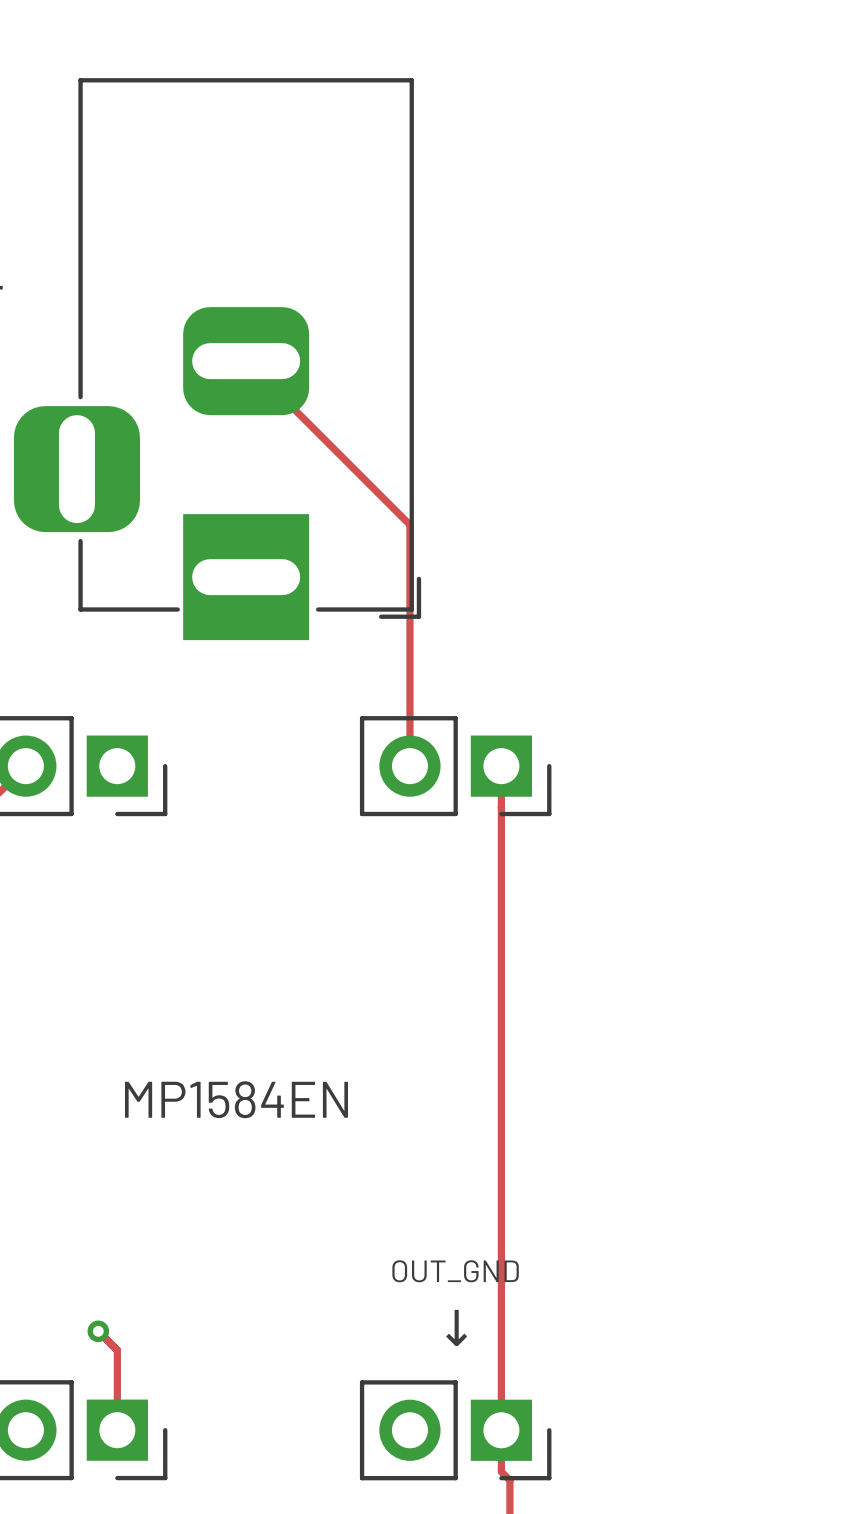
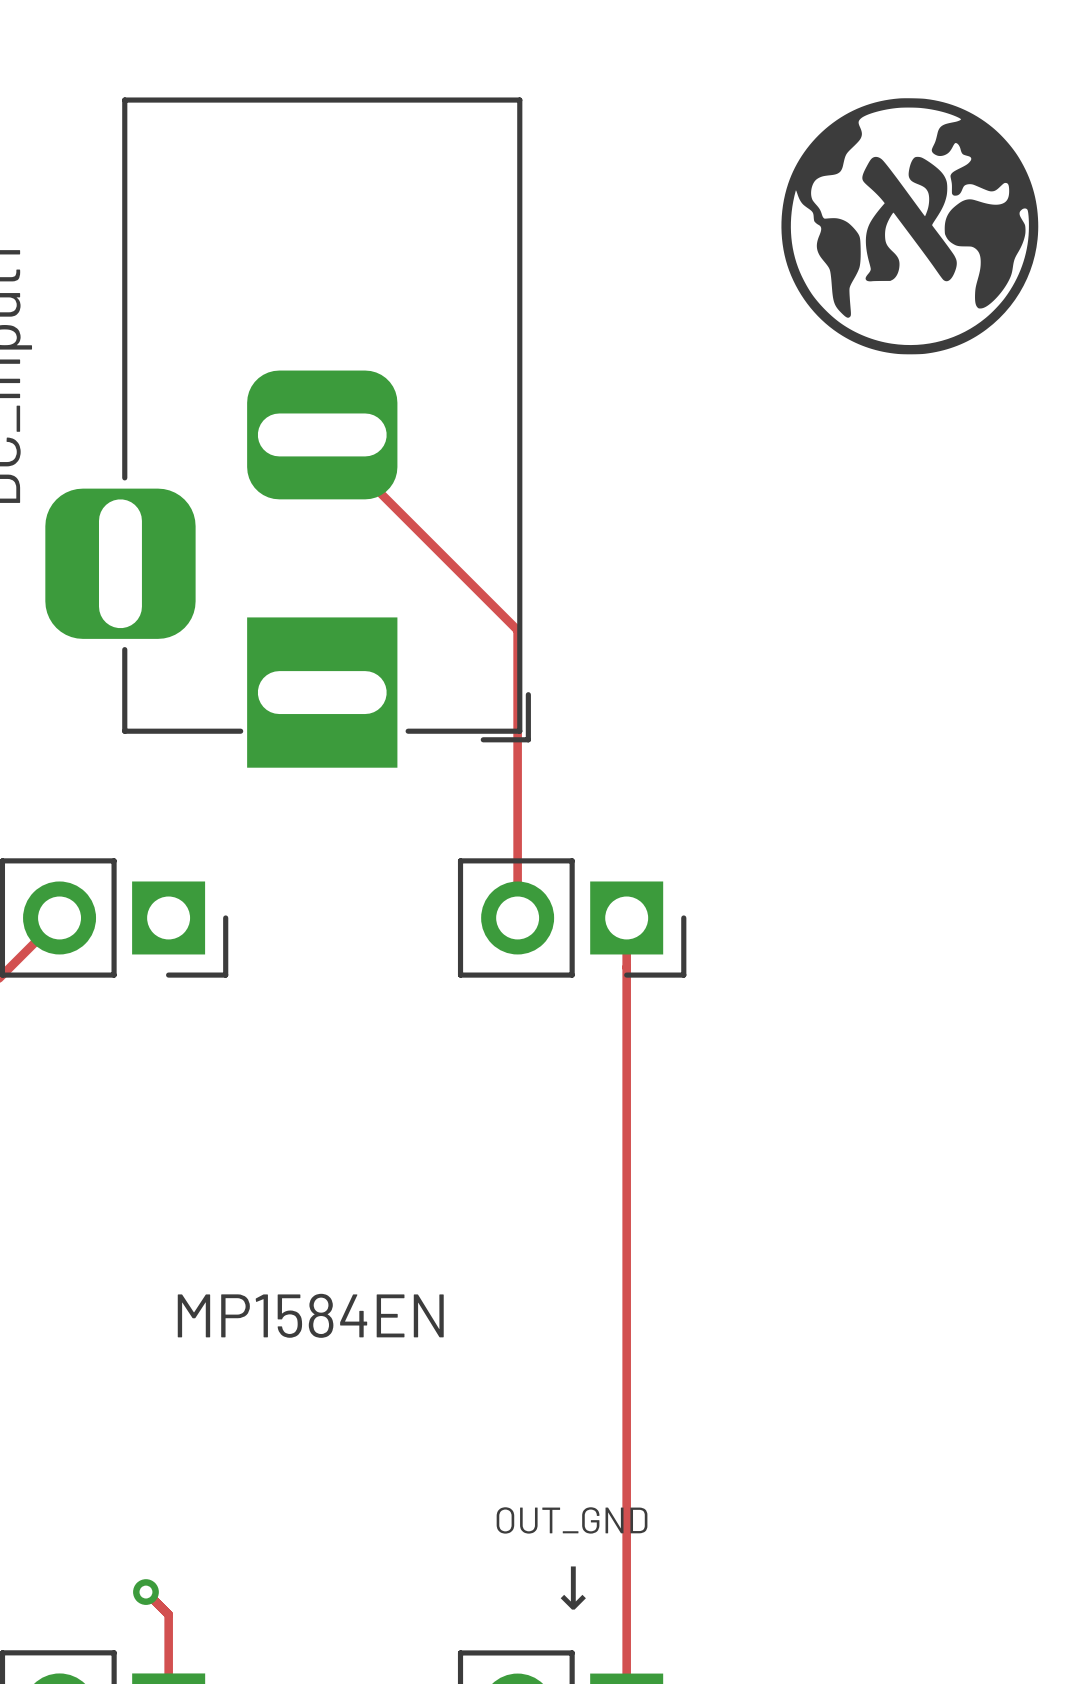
drawing: none -> [781, 98, 1039, 355]

